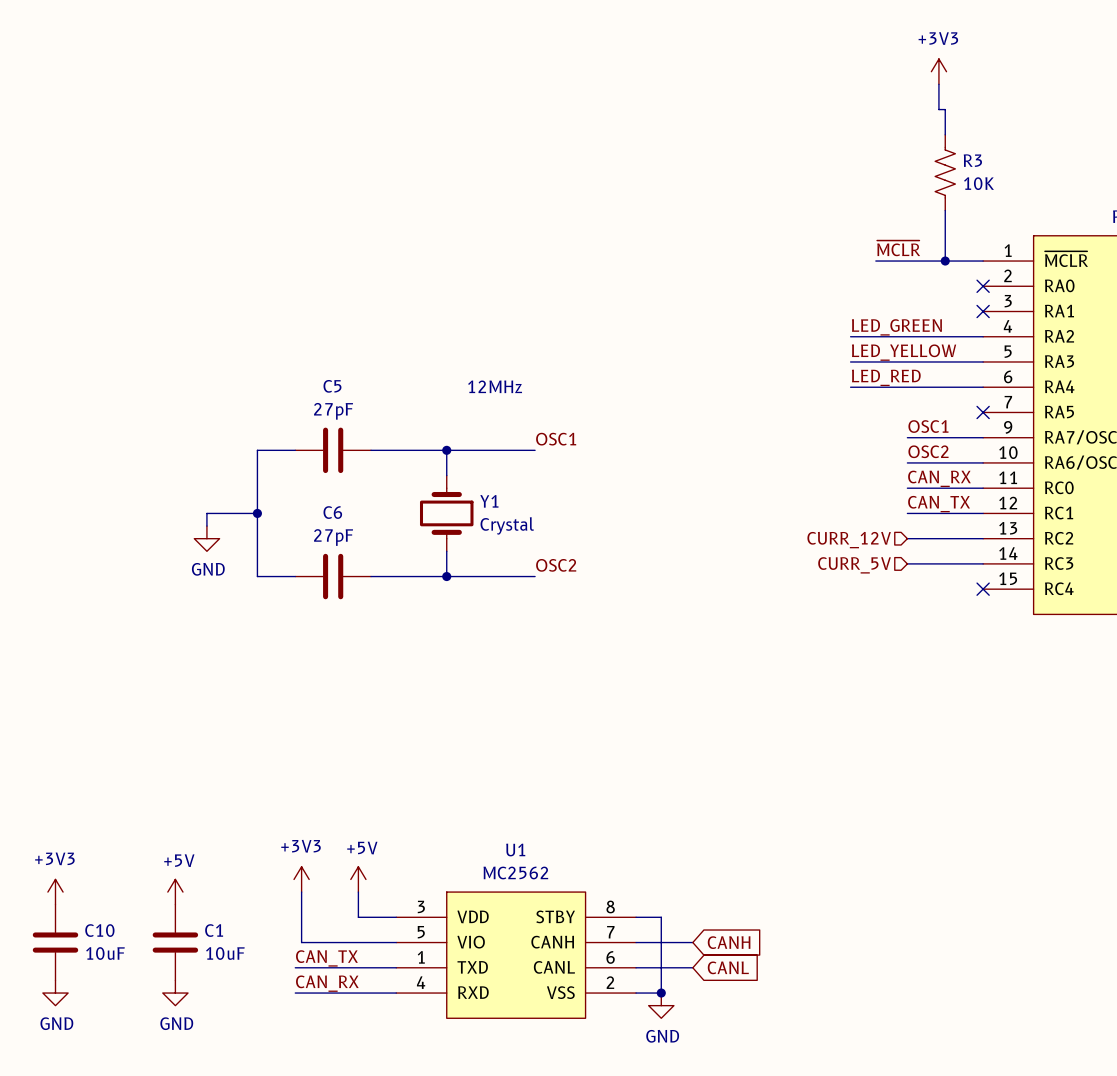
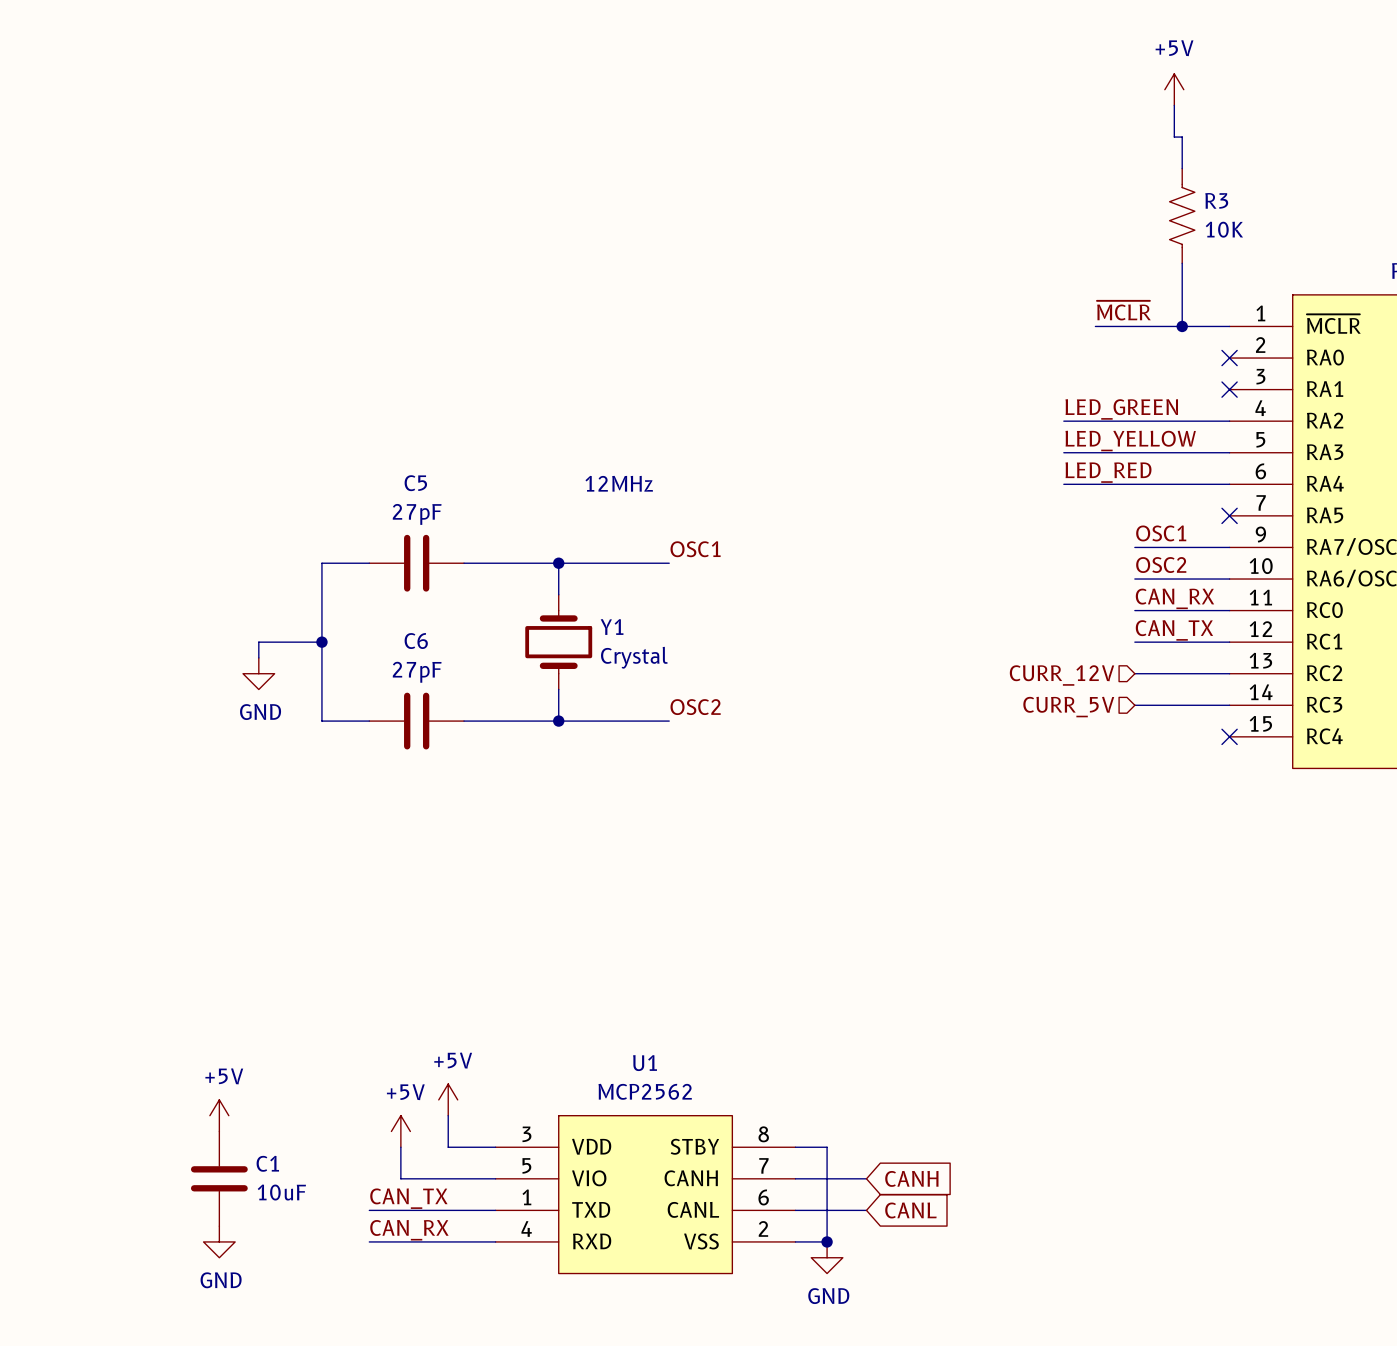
power symbol: +3V3 (938, 71) -> +5V (1174, 89)
U1 value: MC2562 (515, 872) -> MCP2562 (645, 1091)
power symbol: +3V3 (301, 879) -> none
power symbol: +3V3 (55, 892) -> none
wire: (301, 892) (301, 942) (320, 942) -> (400, 1147) (400, 1178)
power symbol: none -> +5V (400, 1131)
C10: 10uF (55, 942) -> none
power symbol: GND (55, 993) -> none

